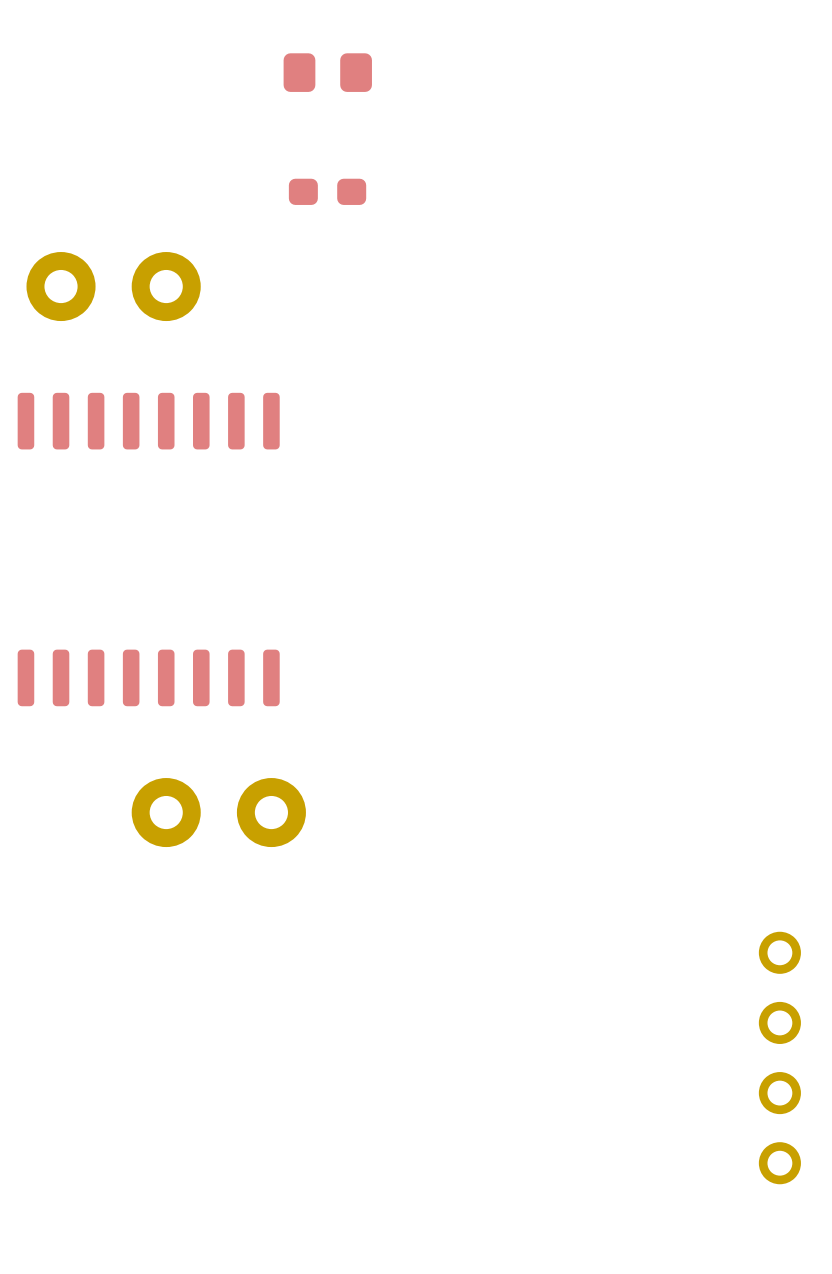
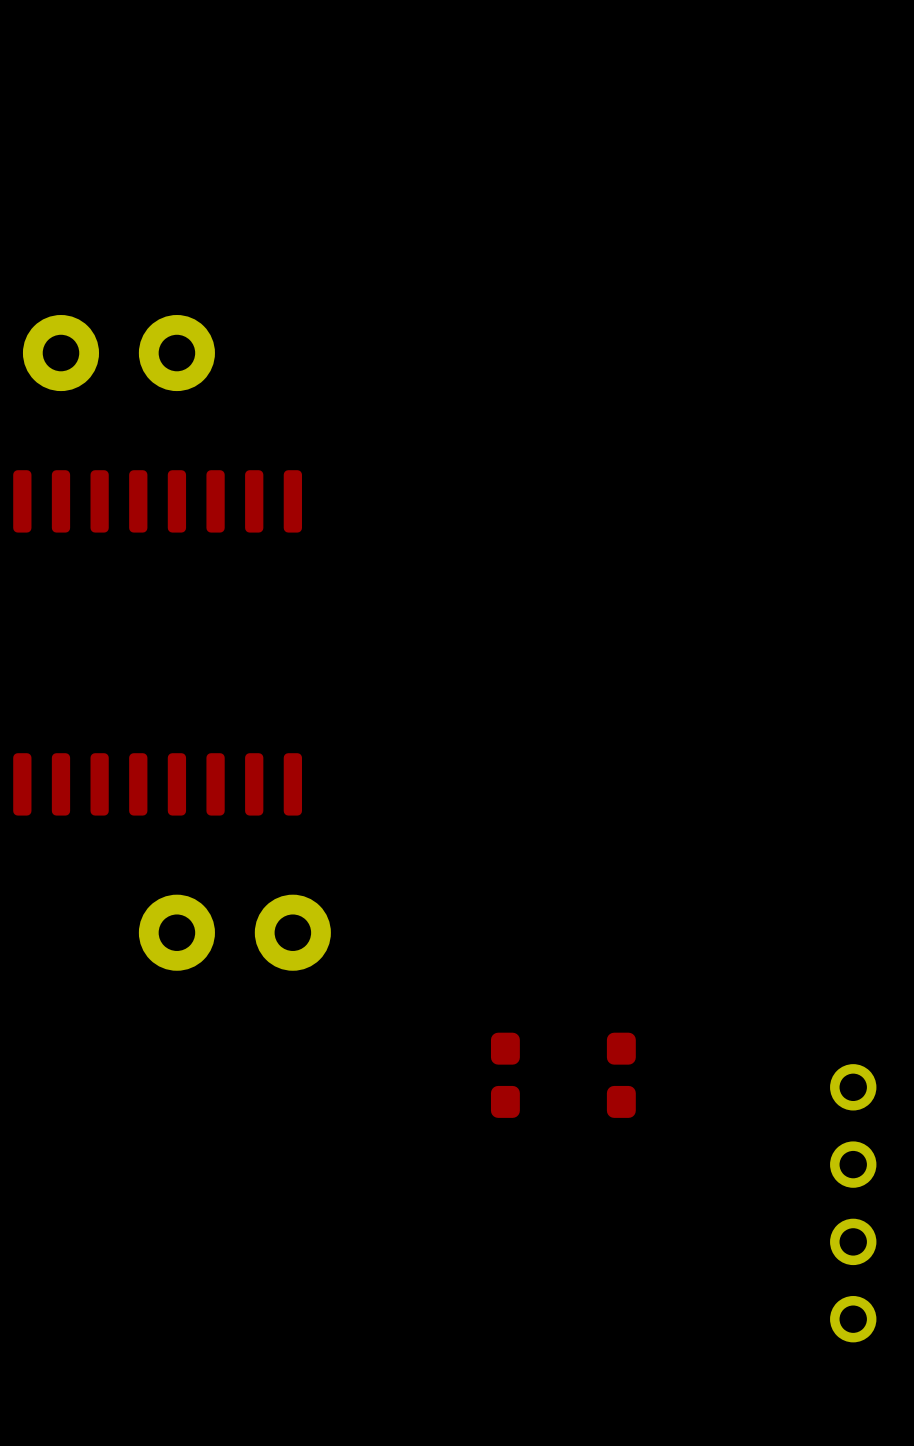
part: (327, 72) -> none
part: (327, 191) -> none
part: none -> (505, 1075)
part: none -> (621, 1075)

